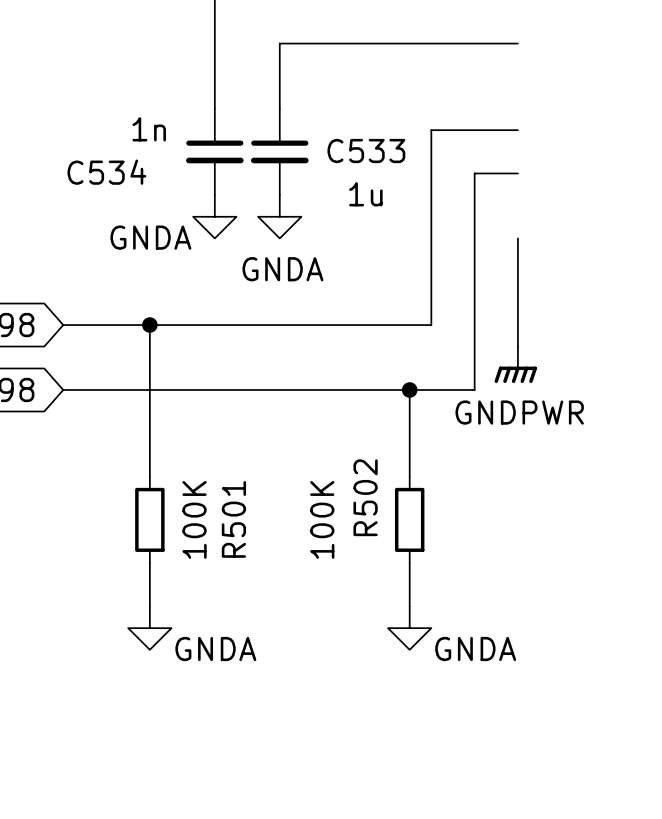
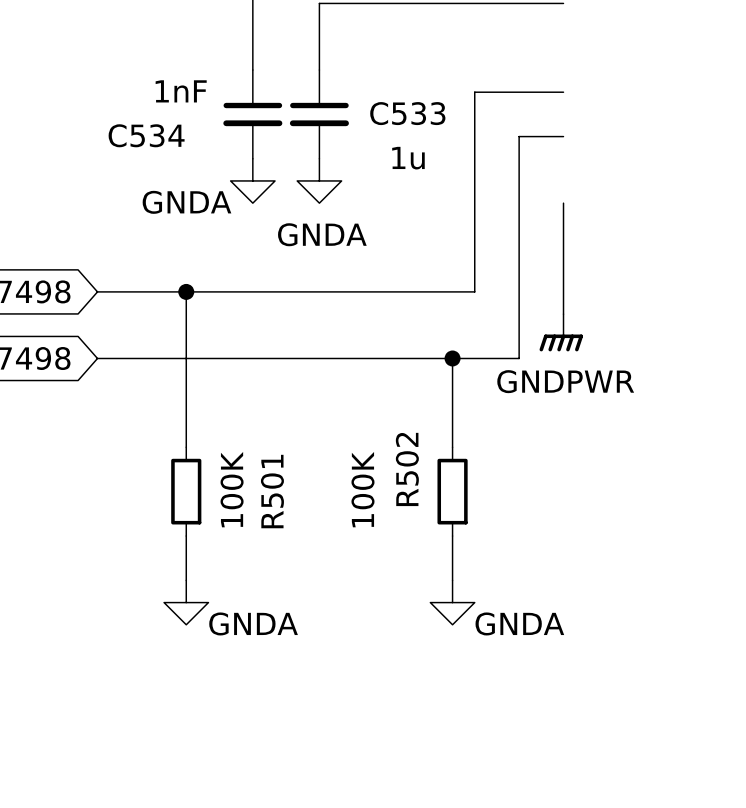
C534 value: 1n (149, 129) -> 1nF (181, 91)

